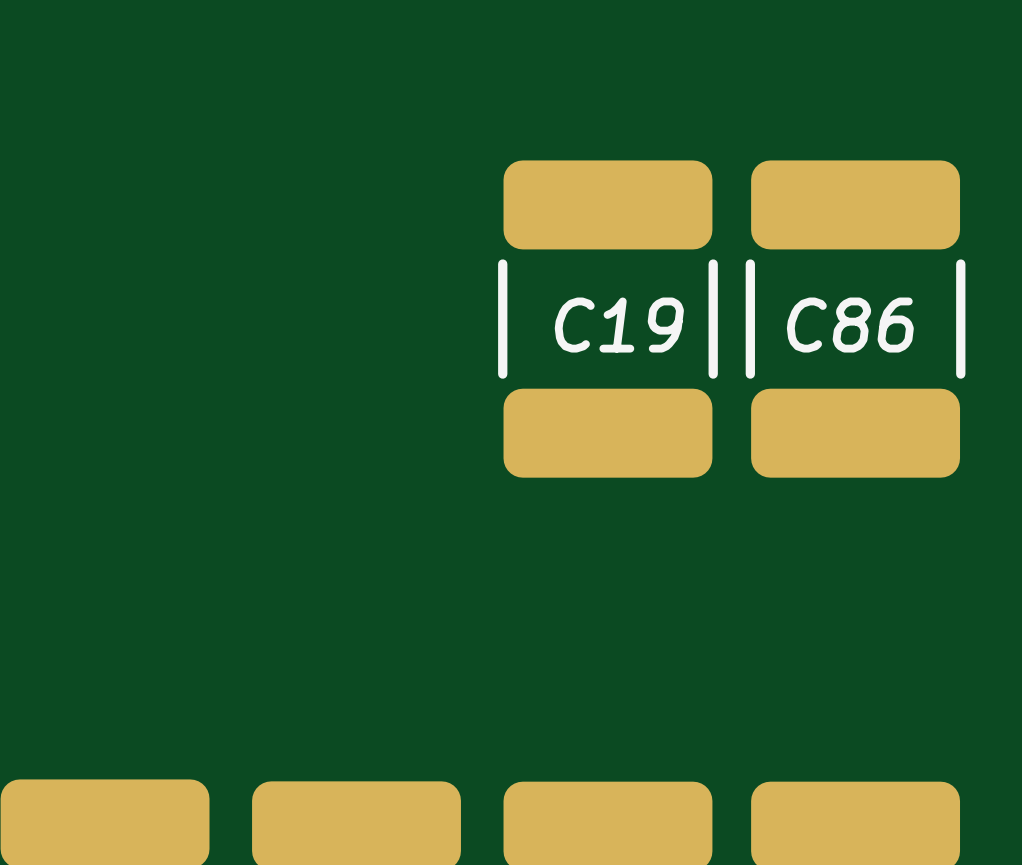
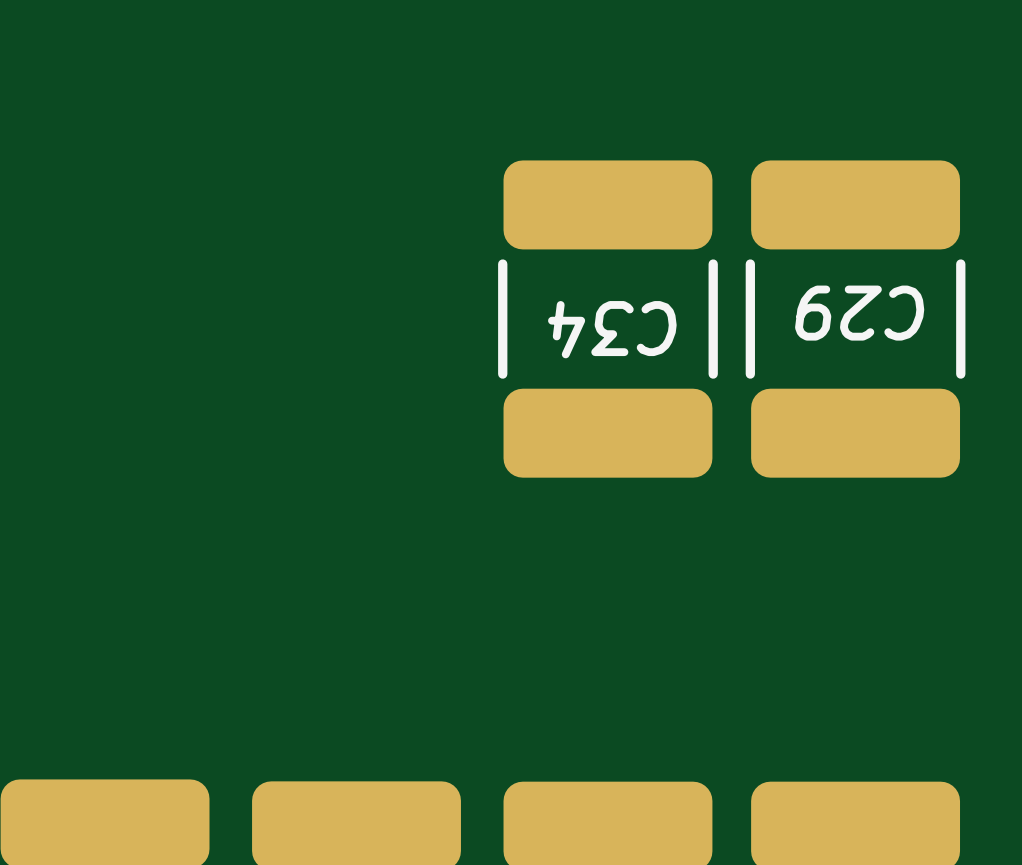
C19 name: C19 (619, 325) -> C34 (612, 329)
C86 name: C86 (850, 325) -> C29 (859, 313)

